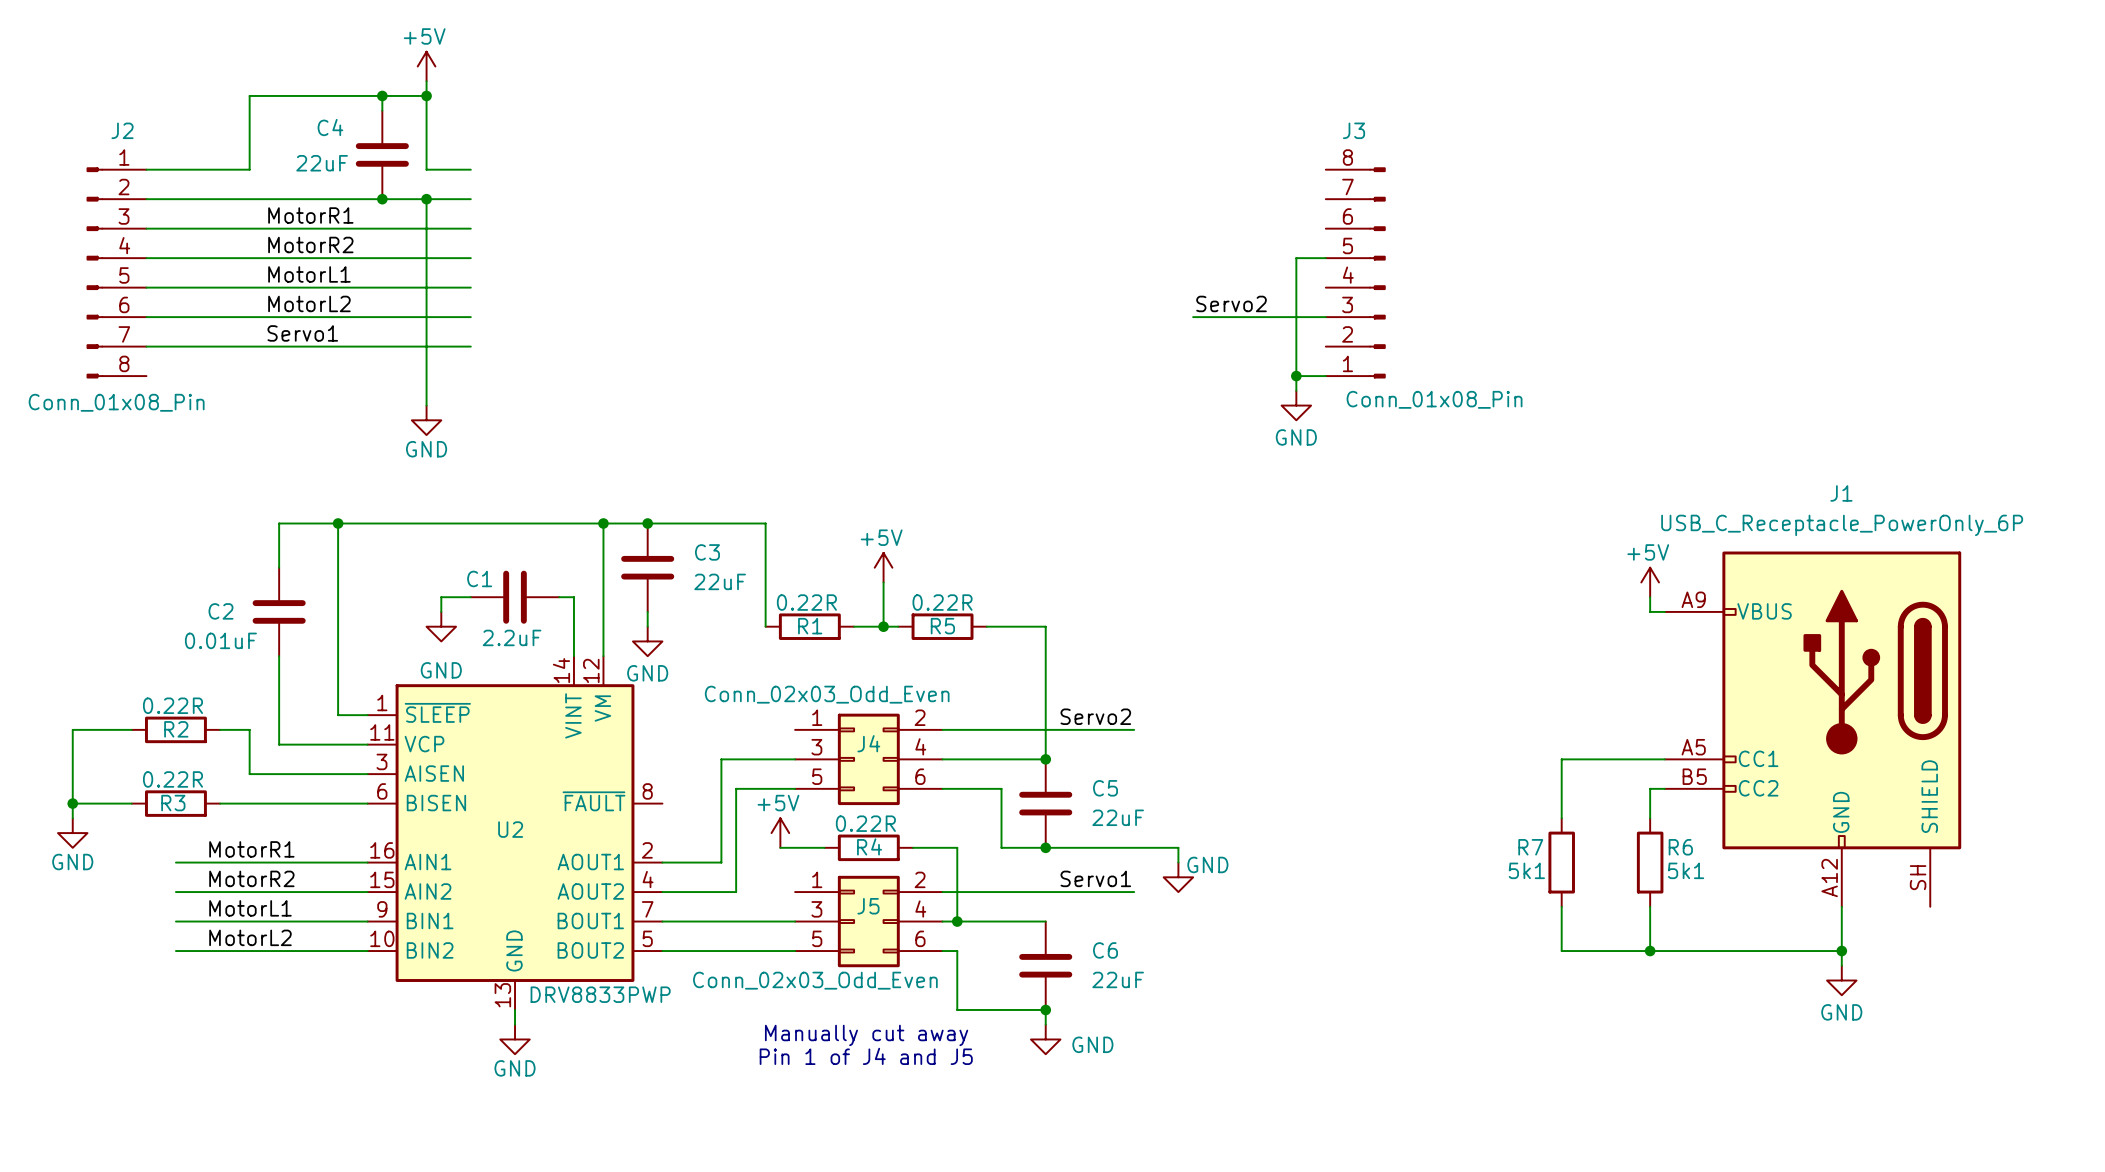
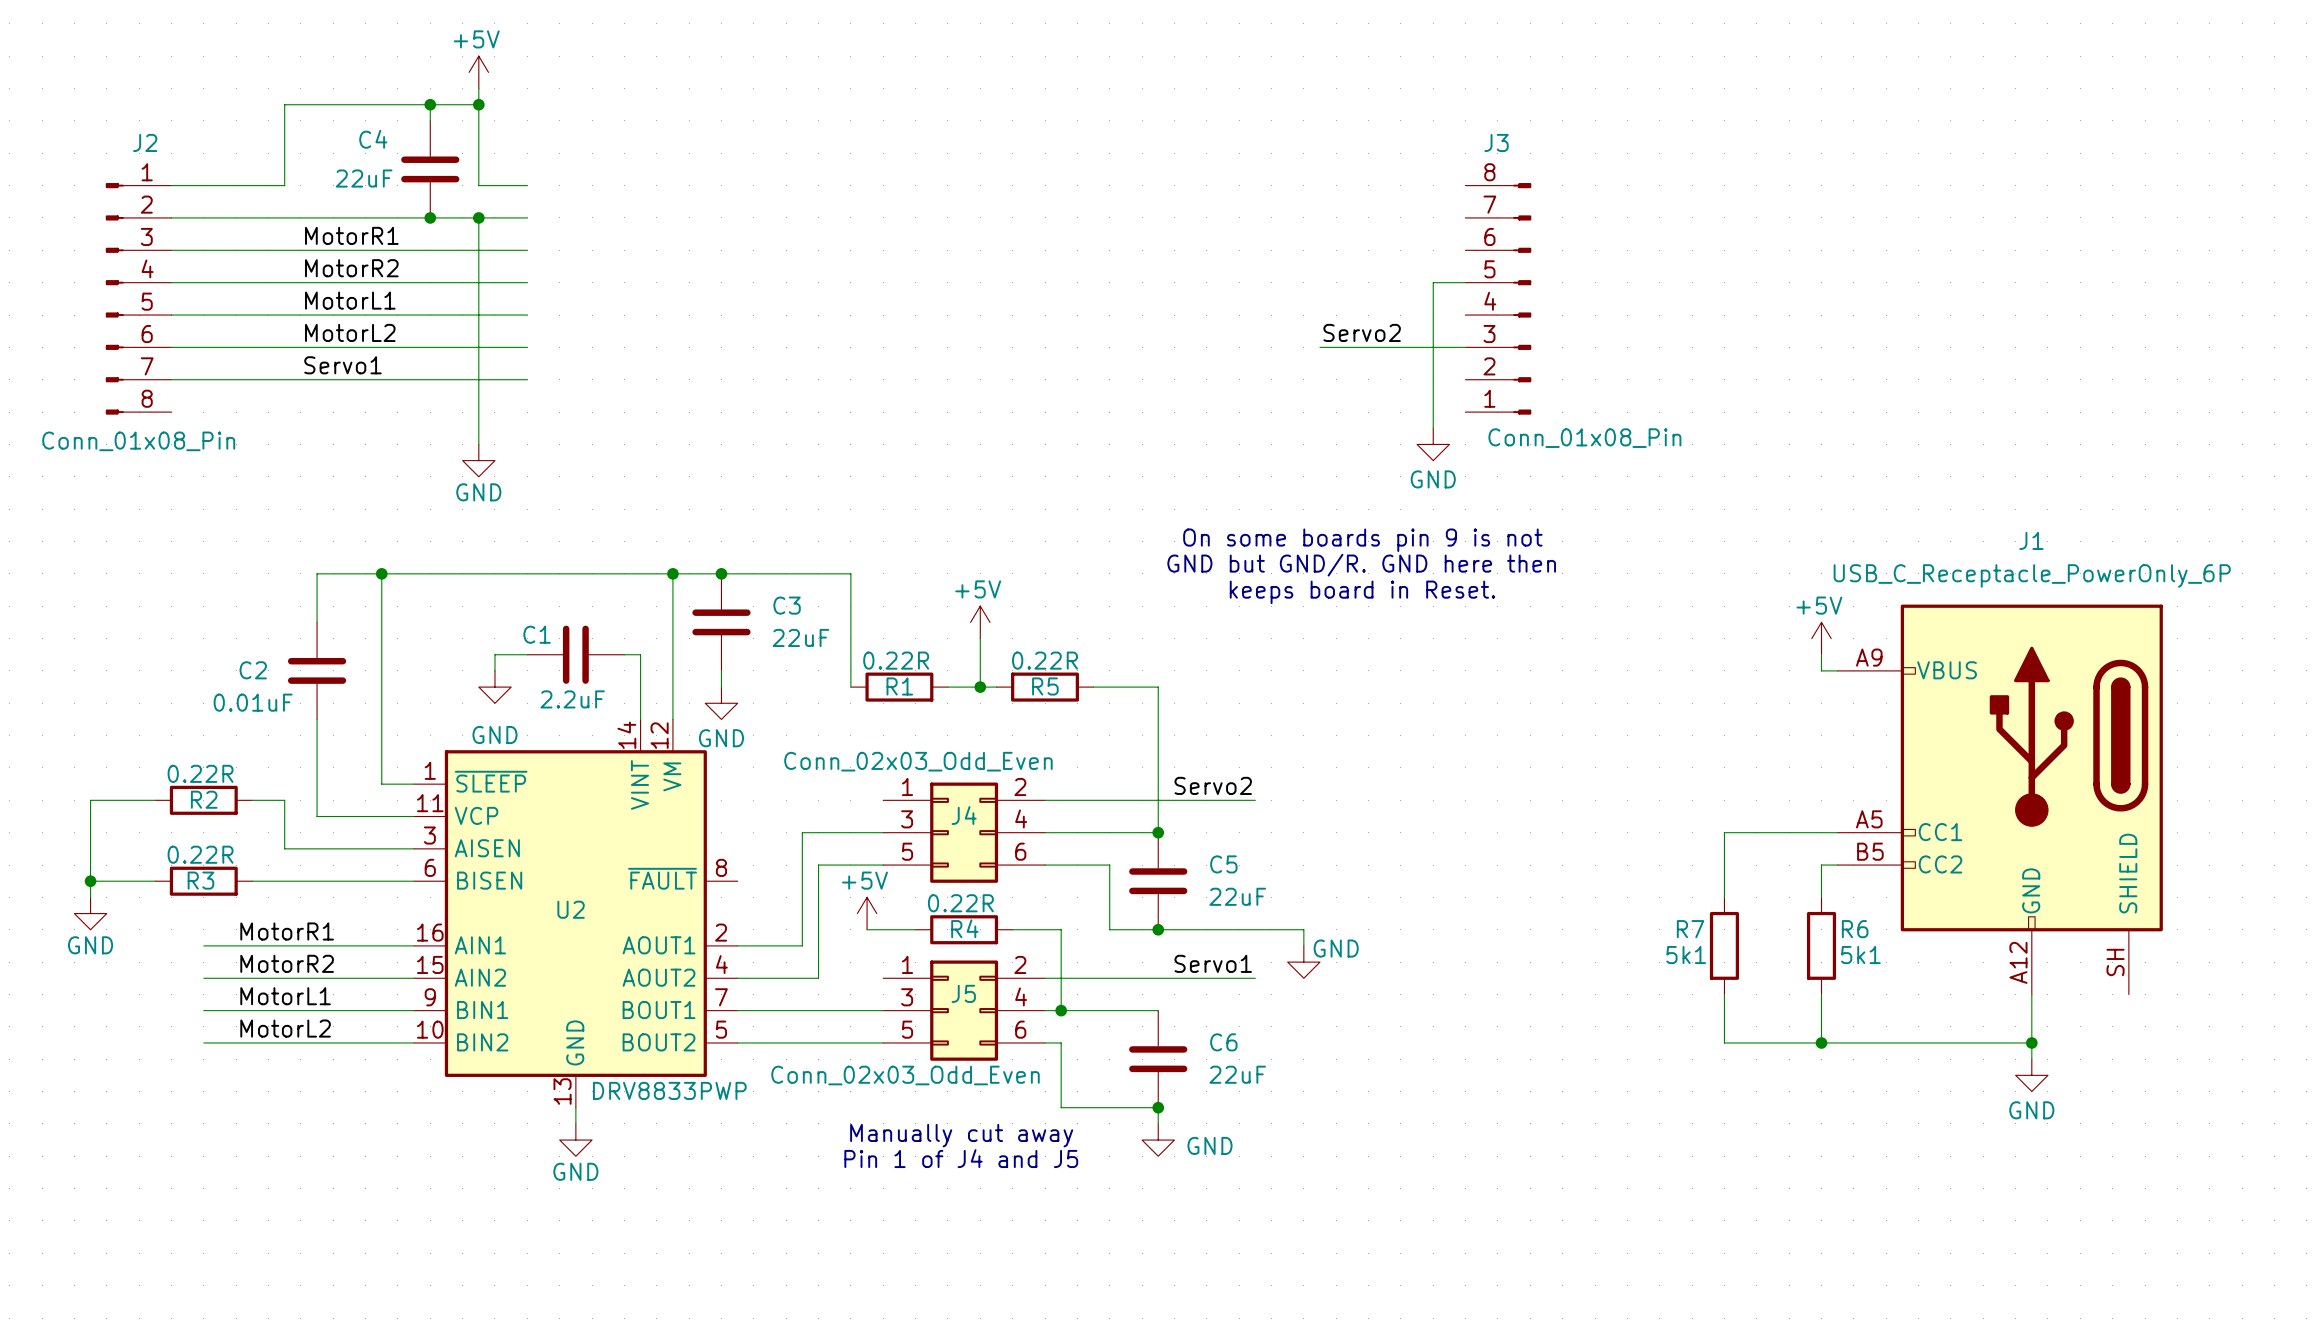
wire: (1296, 376) (1325, 376) -> none
junction: (1296, 376) -> none
text: none -> On some boards pin 9 is not (1362, 540)
text: none -> GND but GND/R. GND here then (1361, 565)
text: none -> keeps board in Reset. (1362, 592)

